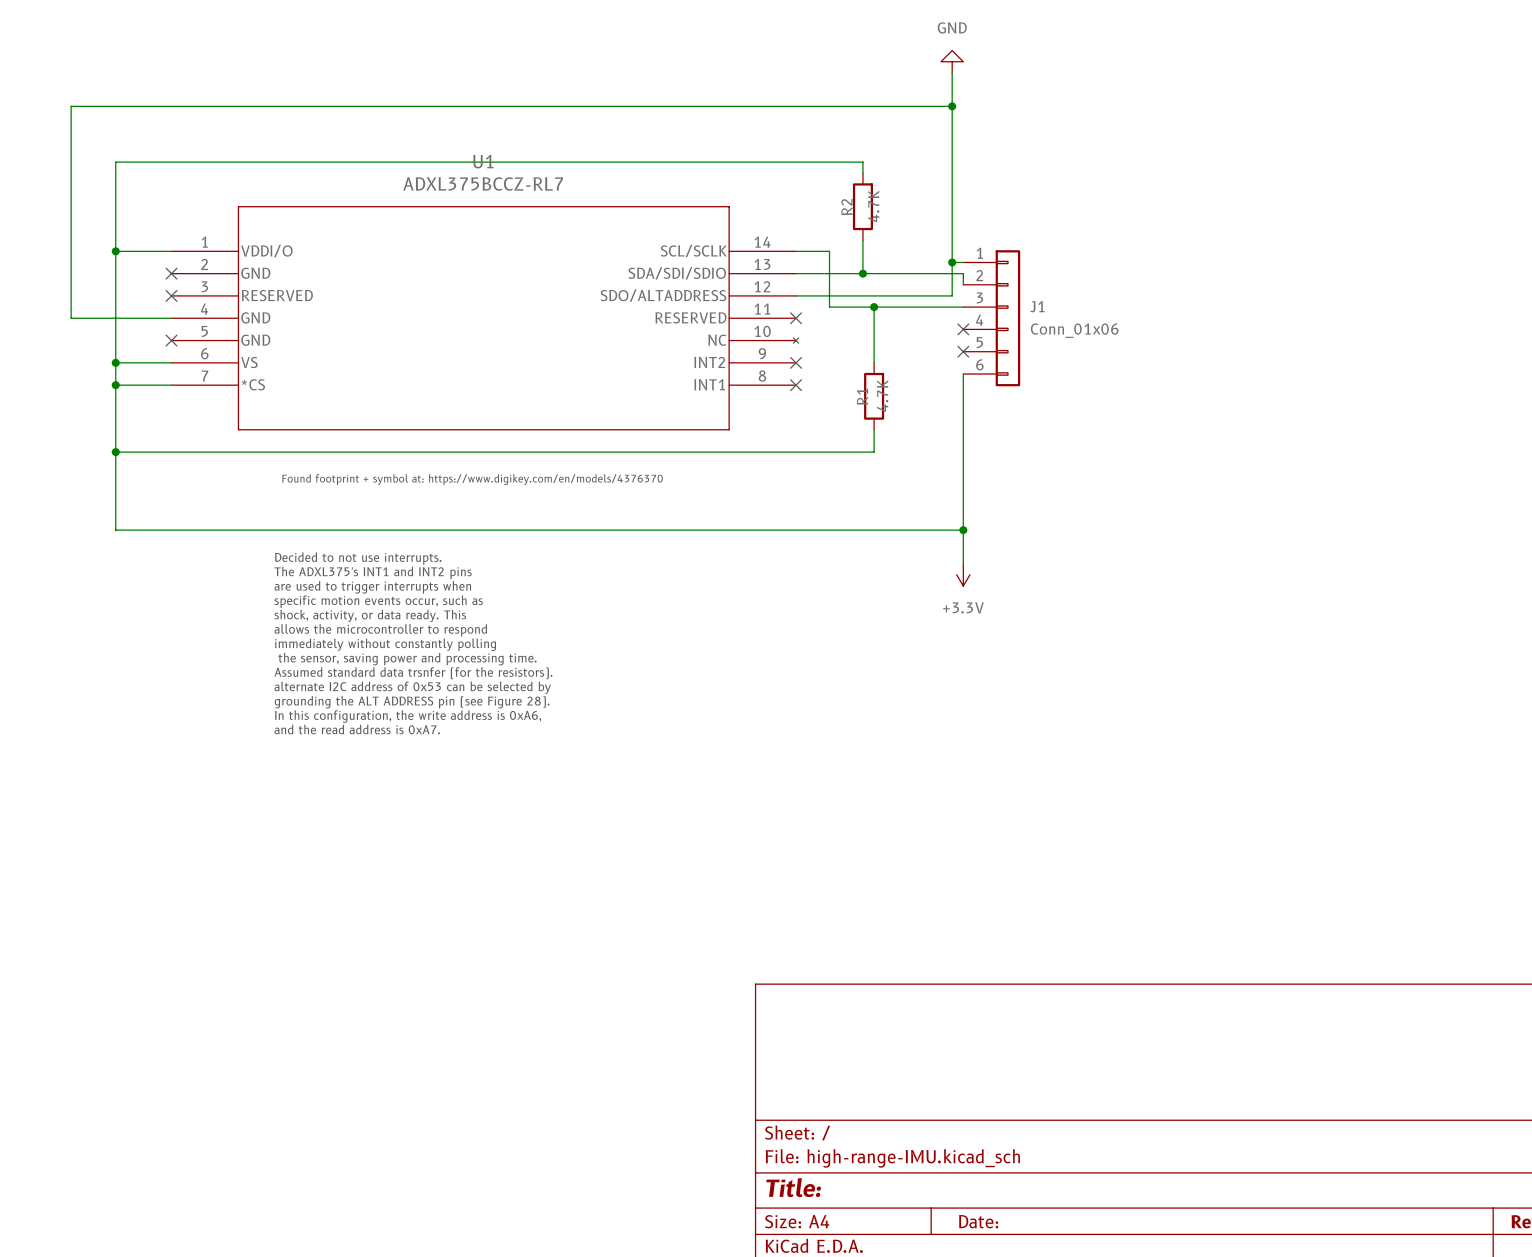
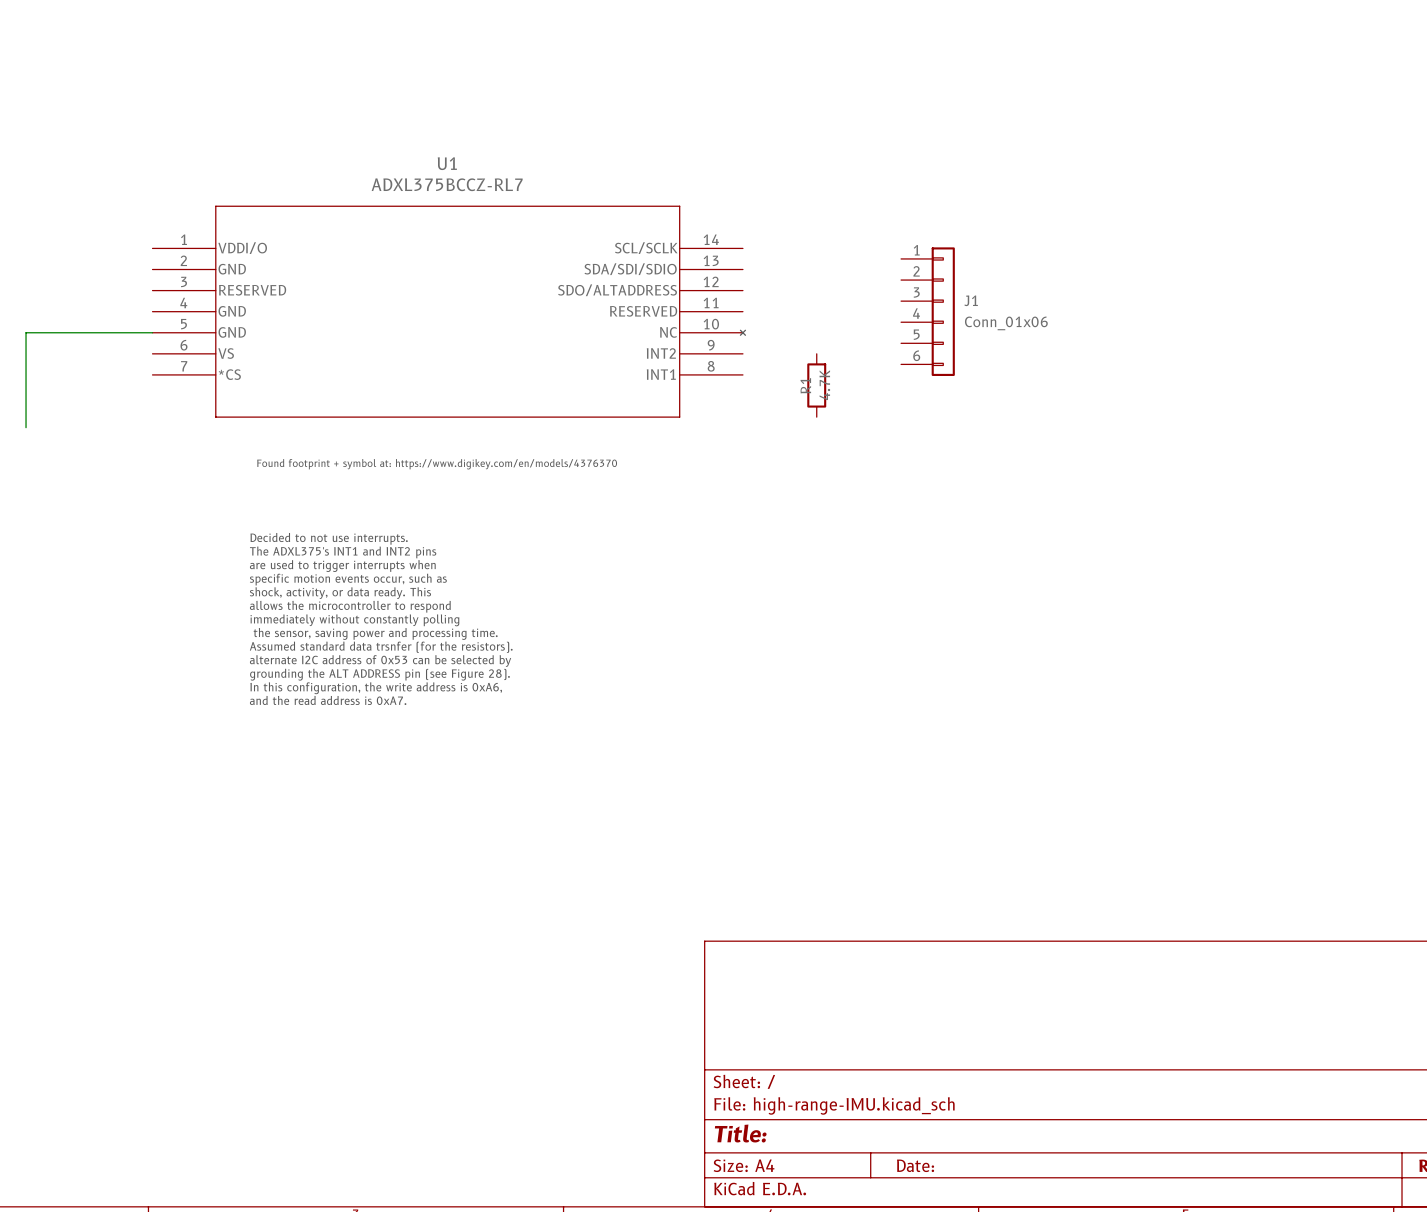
power symbol: GND (952, 61) -> none
wire: (952, 72) (952, 295) (796, 295) -> none
wire: (952, 106) (71, 106) (71, 318) (171, 318) -> none
junction: (952, 106) -> none
wire: (862, 173) (862, 162) (115, 162) (115, 530) (963, 530) -> none
R2: 4.7K (862, 206) -> none
wire: (862, 240) (862, 273) -> none
wire: (115, 251) (171, 251) -> none
junction: (115, 251) -> none
wire: (796, 251) (829, 251) (829, 307) (963, 307) -> none
wire: (952, 262) (963, 262) -> none
junction: (952, 262) -> none
no-connect mark: (171, 273) -> none
wire: (796, 273) (963, 273) (963, 284) -> none
junction: (862, 273) -> none
no-connect mark: (171, 295) -> none
wire: (874, 307) (874, 362) -> none
junction: (874, 307) -> none
no-connect mark: (796, 318) -> none
no-connect mark: (963, 329) -> none
wire: none -> (152, 332) (26, 332) (26, 427)
no-connect mark: (171, 340) -> none
no-connect mark: (963, 351) -> none
wire: (115, 362) (171, 362) -> none
junction: (115, 362) -> none
no-connect mark: (796, 362) -> none
wire: (963, 374) (963, 563) -> none
wire: (115, 385) (171, 385) -> none
junction: (115, 385) -> none
no-connect mark: (796, 385) -> none
wire: (874, 429) (874, 452) (115, 452) -> none
junction: (115, 452) -> none
junction: (963, 530) -> none
power symbol: +3.3V (963, 574) -> none

